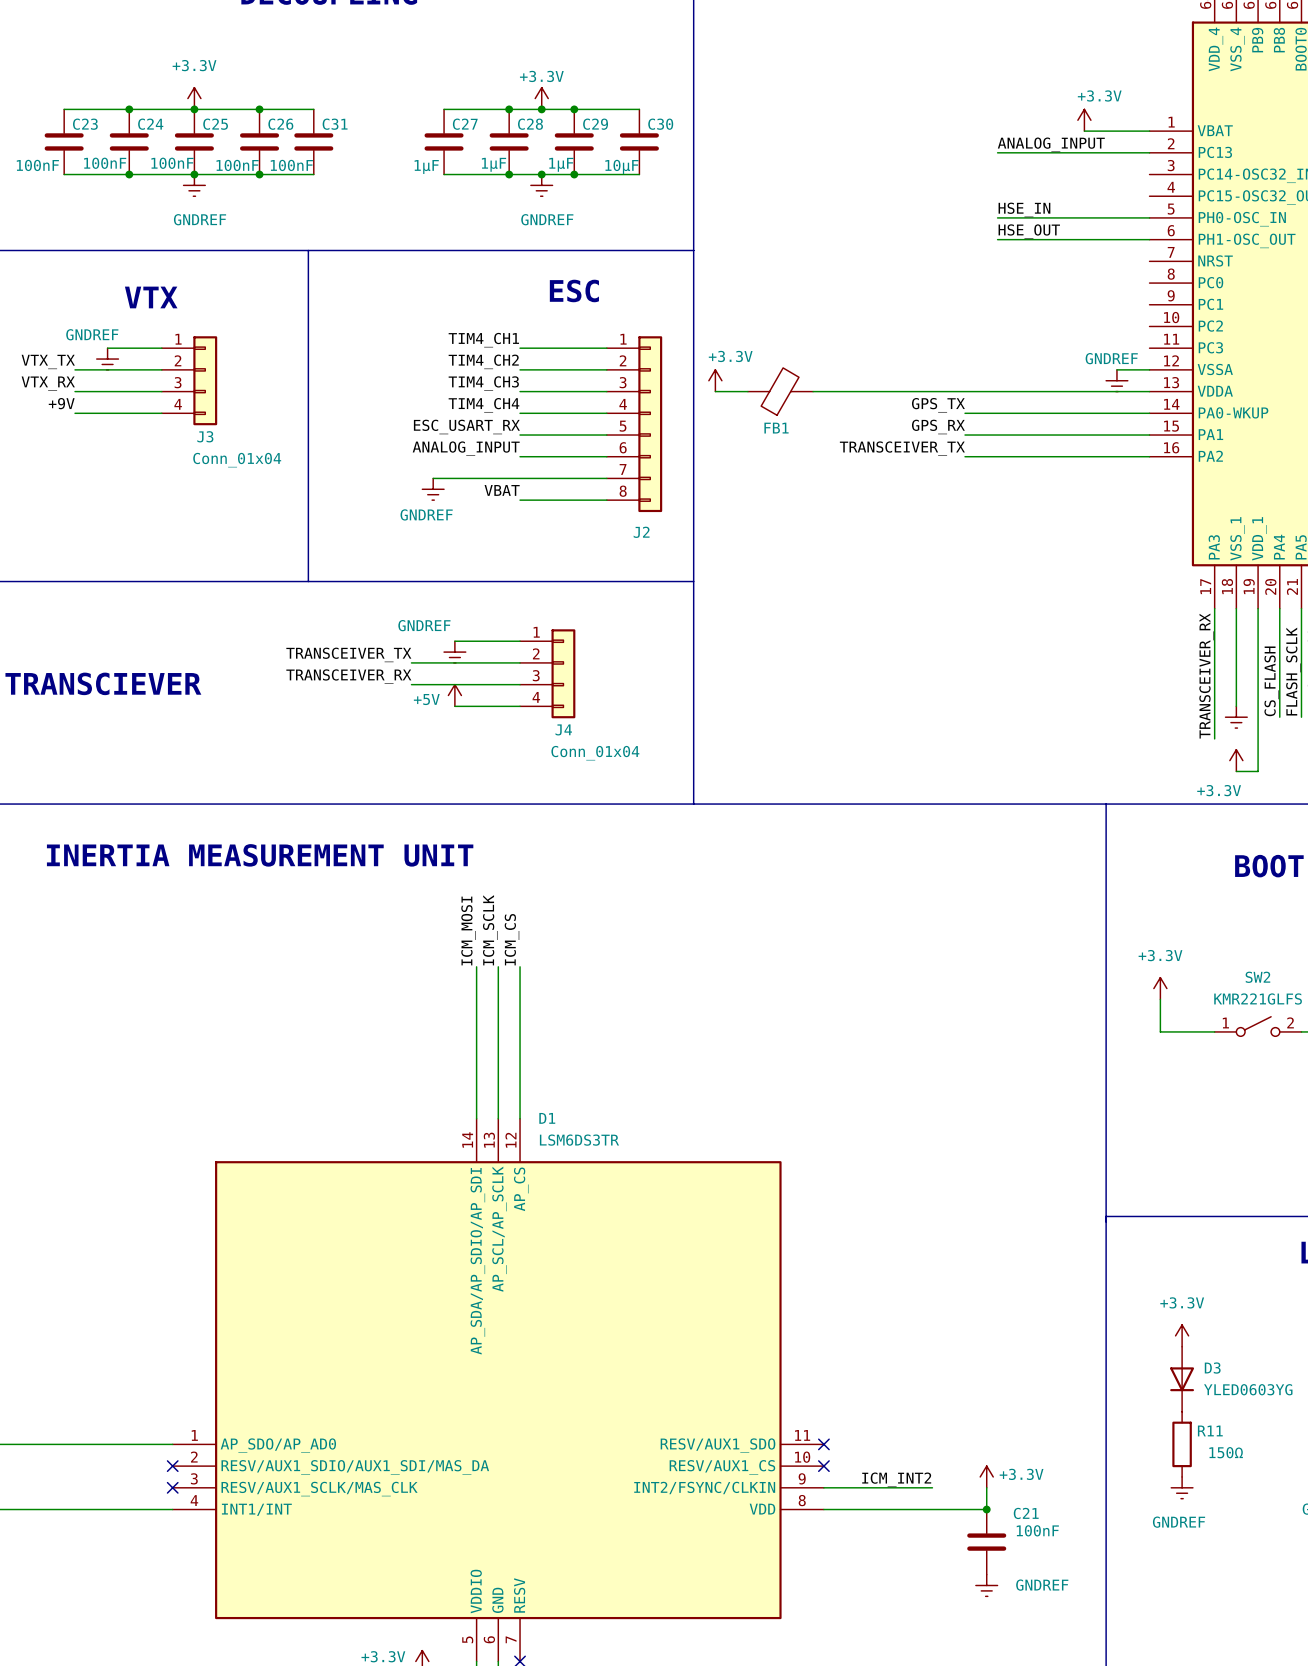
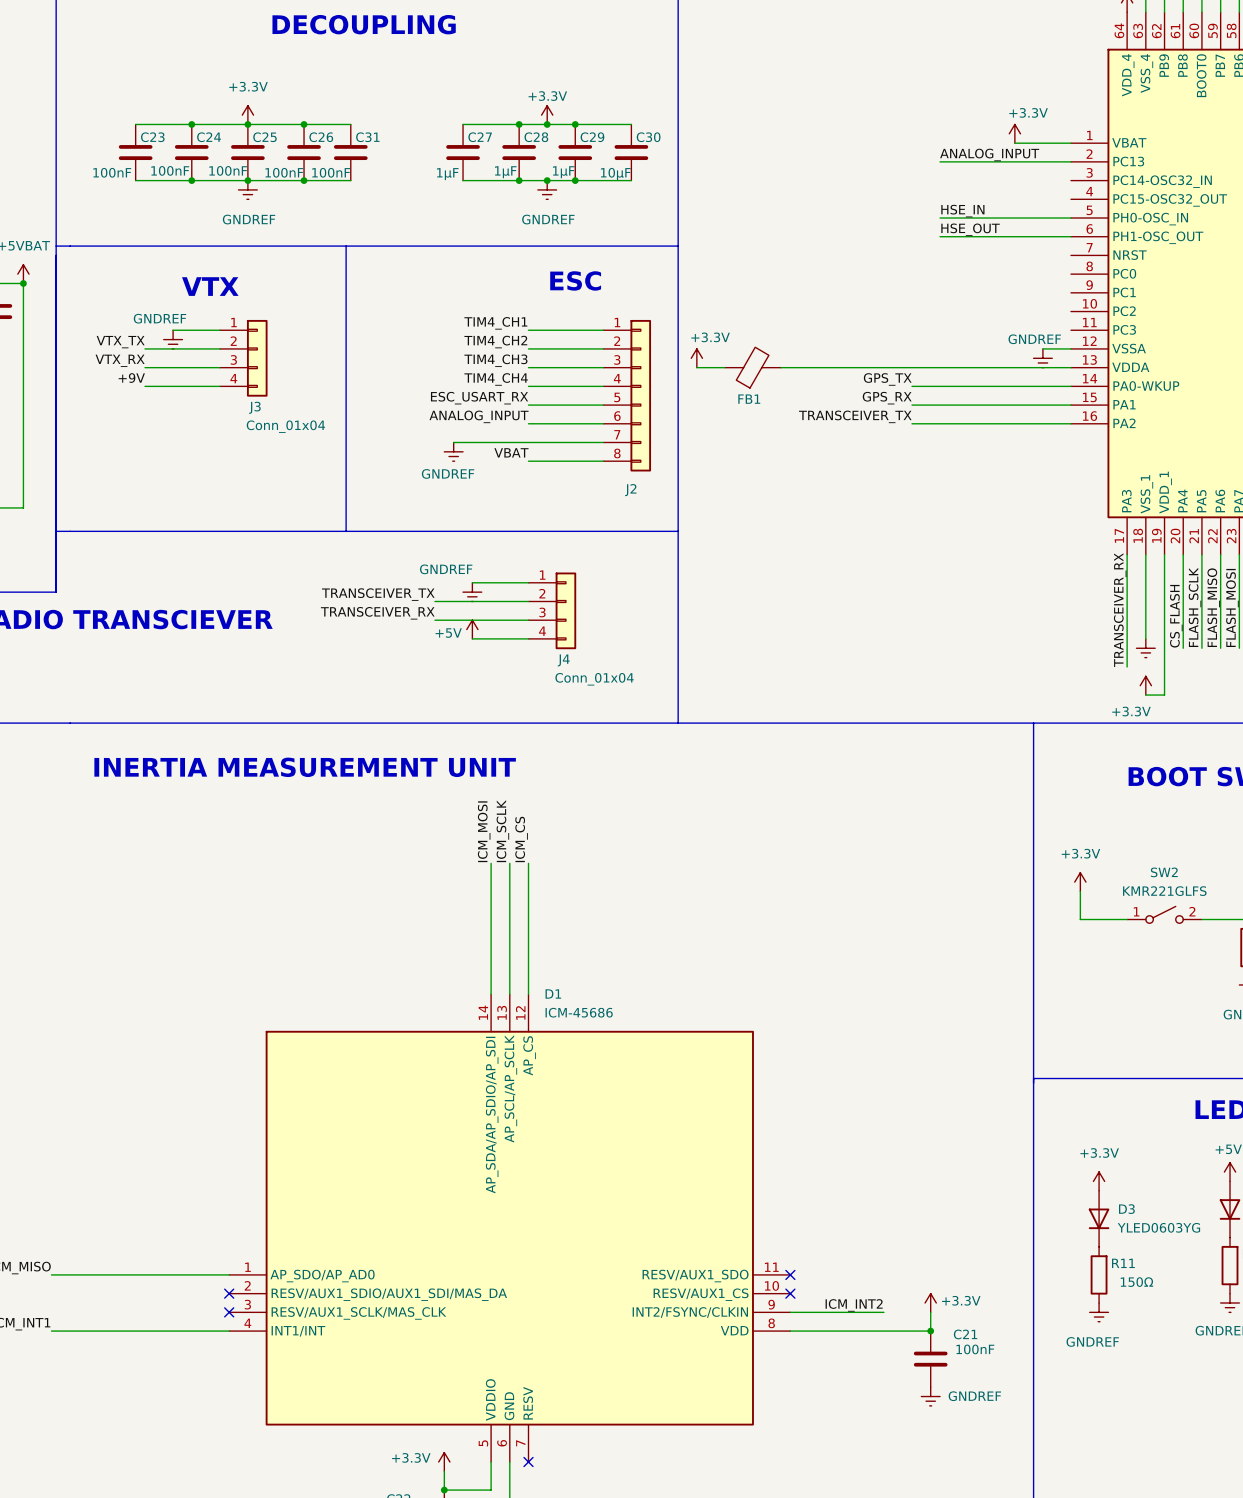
D1 value: LSM6DS3TR (579, 1140) -> ICM-45686 (579, 1012)

